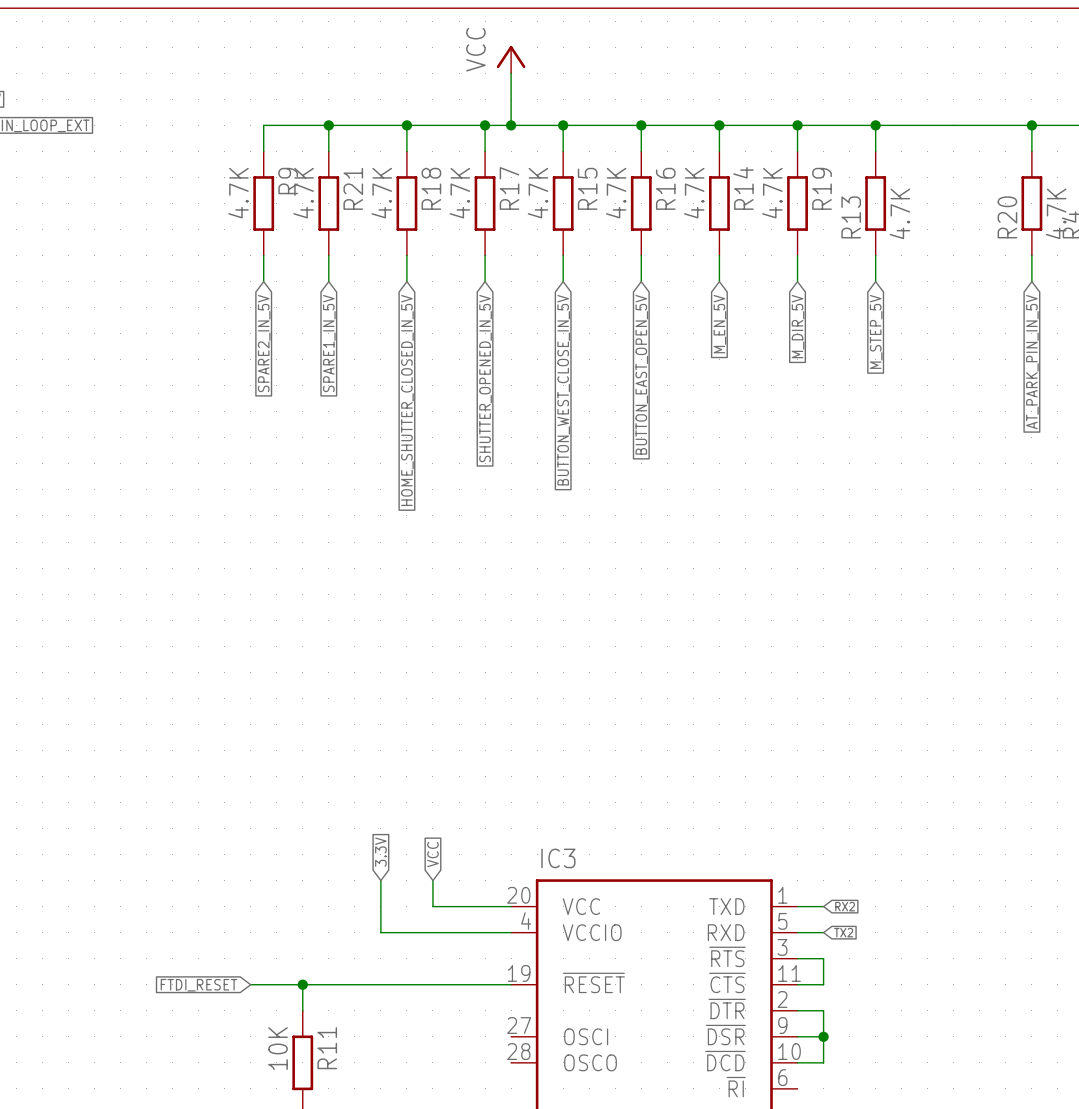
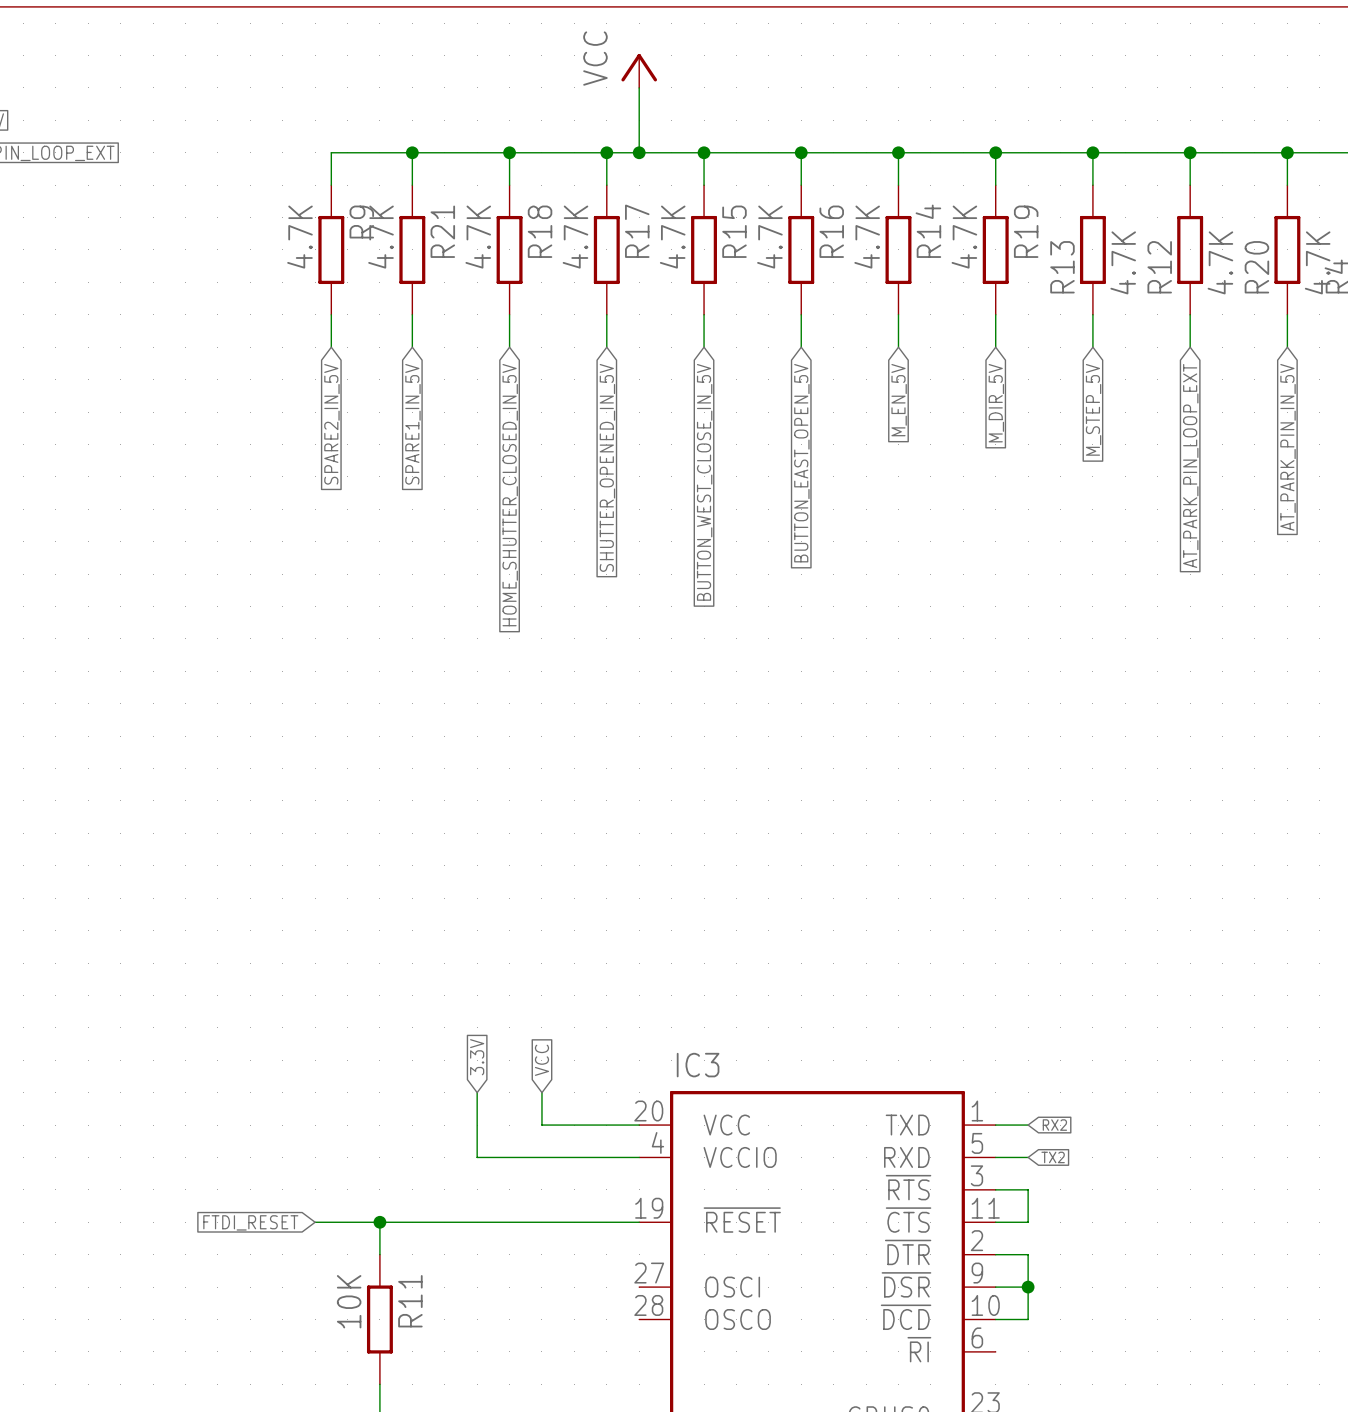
wire: none -> (1190, 152) (1190, 185)
junction: none -> (1190, 152)
R12: none -> 4.7K (1190, 249)
wire: none -> (1190, 314) (1190, 347)
global label: none -> AT_PARK_PIN_LOOP_EXT (1190, 465)

